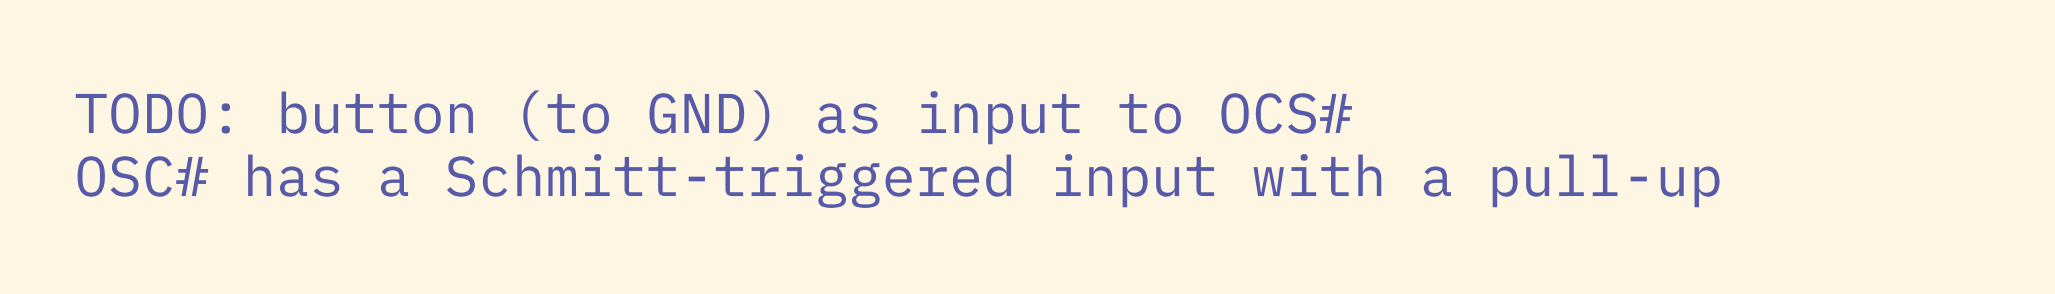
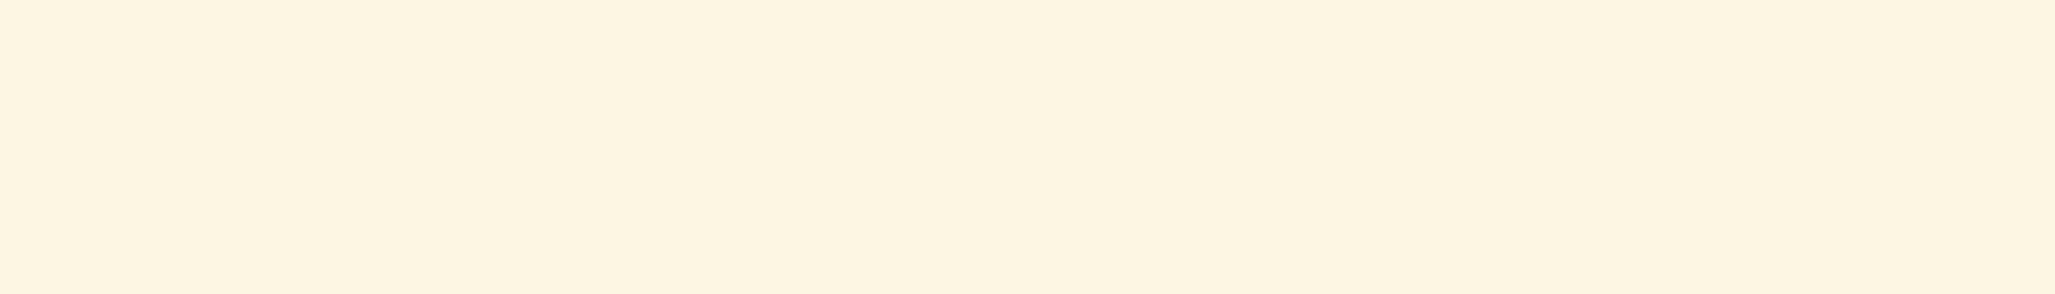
text: TODO: button (to GND) as input to OCS# (713, 117) -> none
text: OSC# has a Schmitt-triggered input with a pull-up (898, 181) -> none

